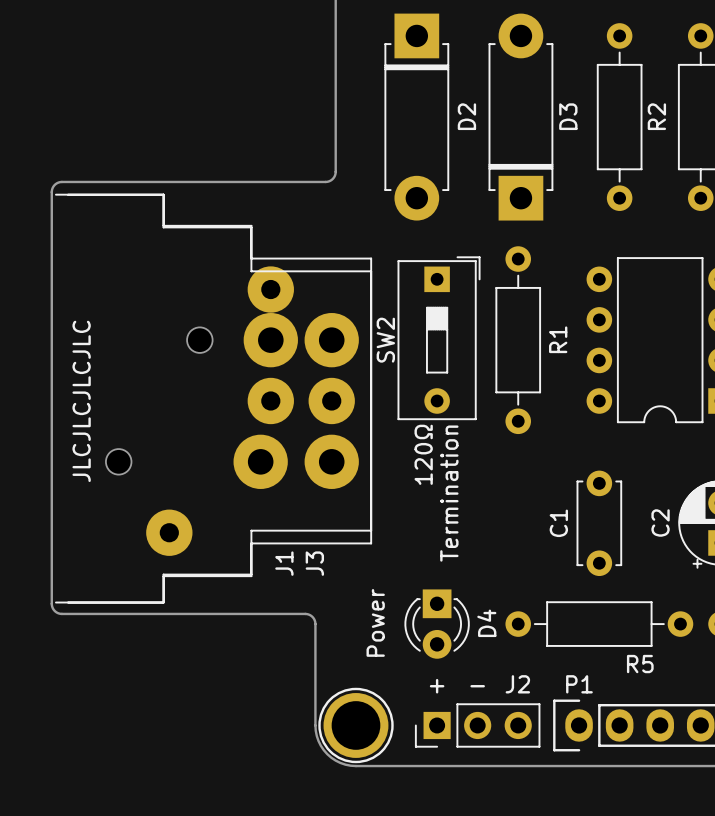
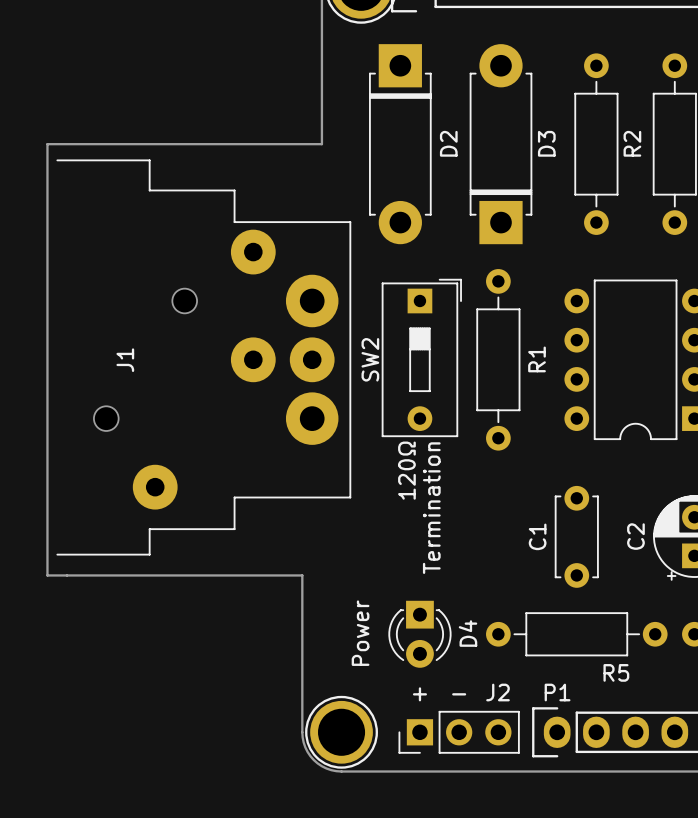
board edge: (335, 117) (335, 173) (333, 178) (328, 181) (61, 181) (54, 184) (51, 192) -> (321, 144) (47, 144) (47, 216)
J3: (213, 398) -> none
J1 position: (219, 398) -> (203, 357)
text: JLCJLCJLCJLC (81, 401) -> none
board edge: (51, 563) (51, 605) (53, 609) (59, 613) (305, 613) (312, 616) (315, 624) -> (47, 575) (302, 575) (302, 634)
J1 name position: J1 (284, 563) -> J1 (125, 360)

